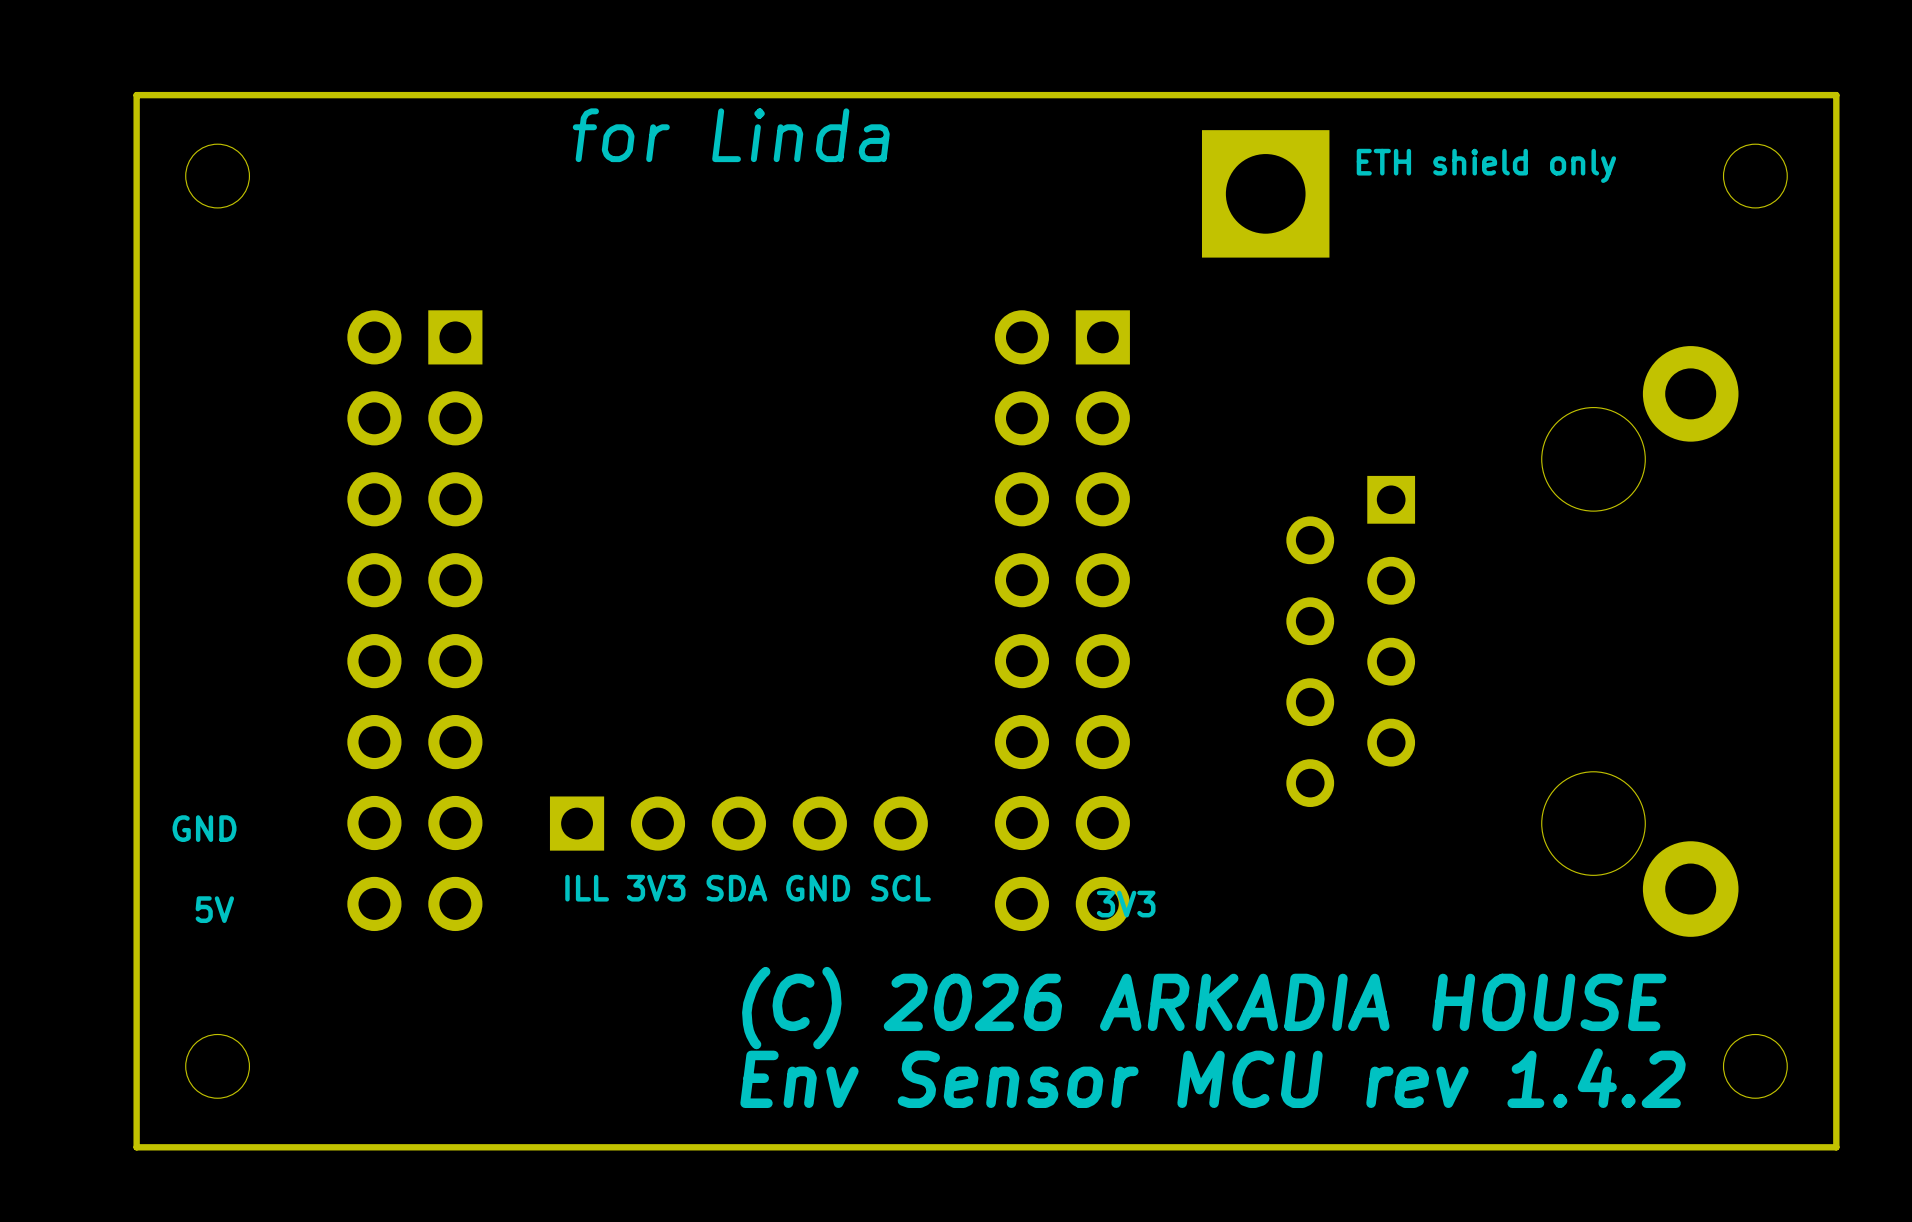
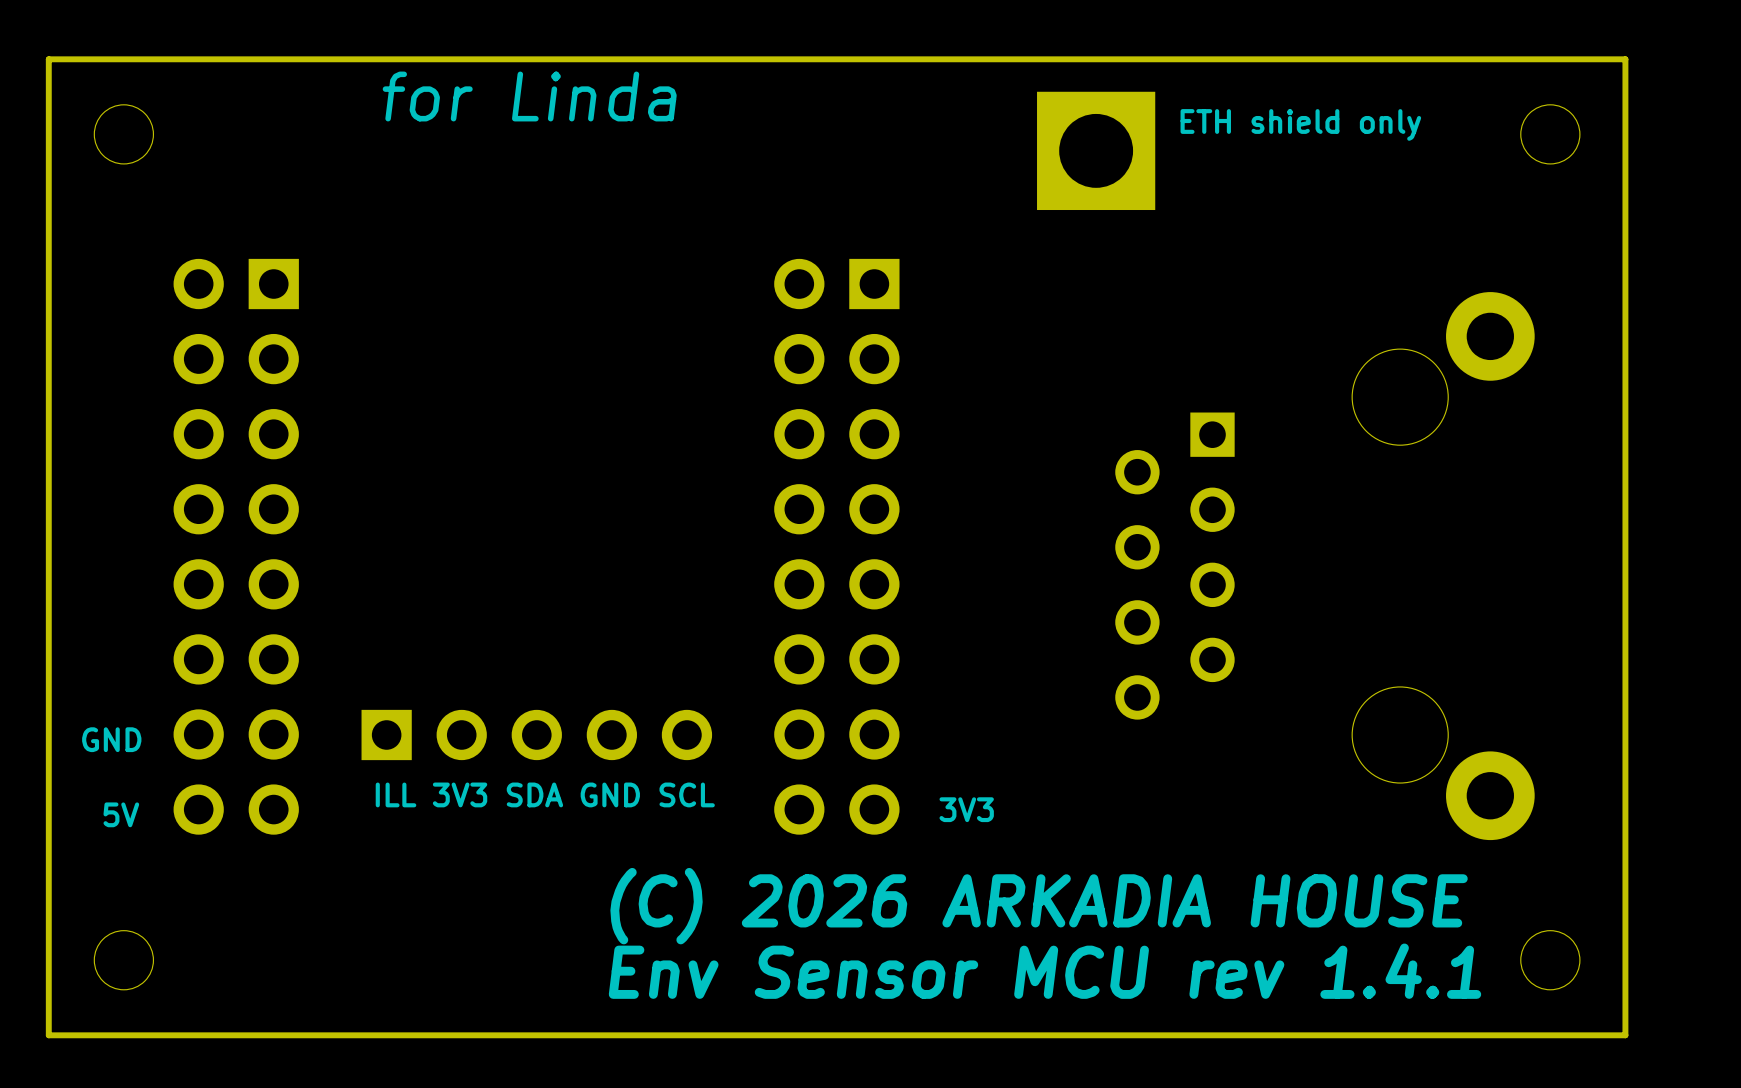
text position: for Linda (731, 135) -> for Linda (529, 96)
part position: (414, 620) -> (236, 546)
part position: (1062, 620) -> (836, 546)
part position: (738, 823) -> (536, 734)
text position: ILL 3V3 SDA GND SCL (748, 888) -> ILL 3V3 SDA GND SCL (545, 794)
text: Env Sensor MCU rev 1.4.2 (1213, 1078) -> Env Sensor MCU rev 1.4.1 (1045, 971)

